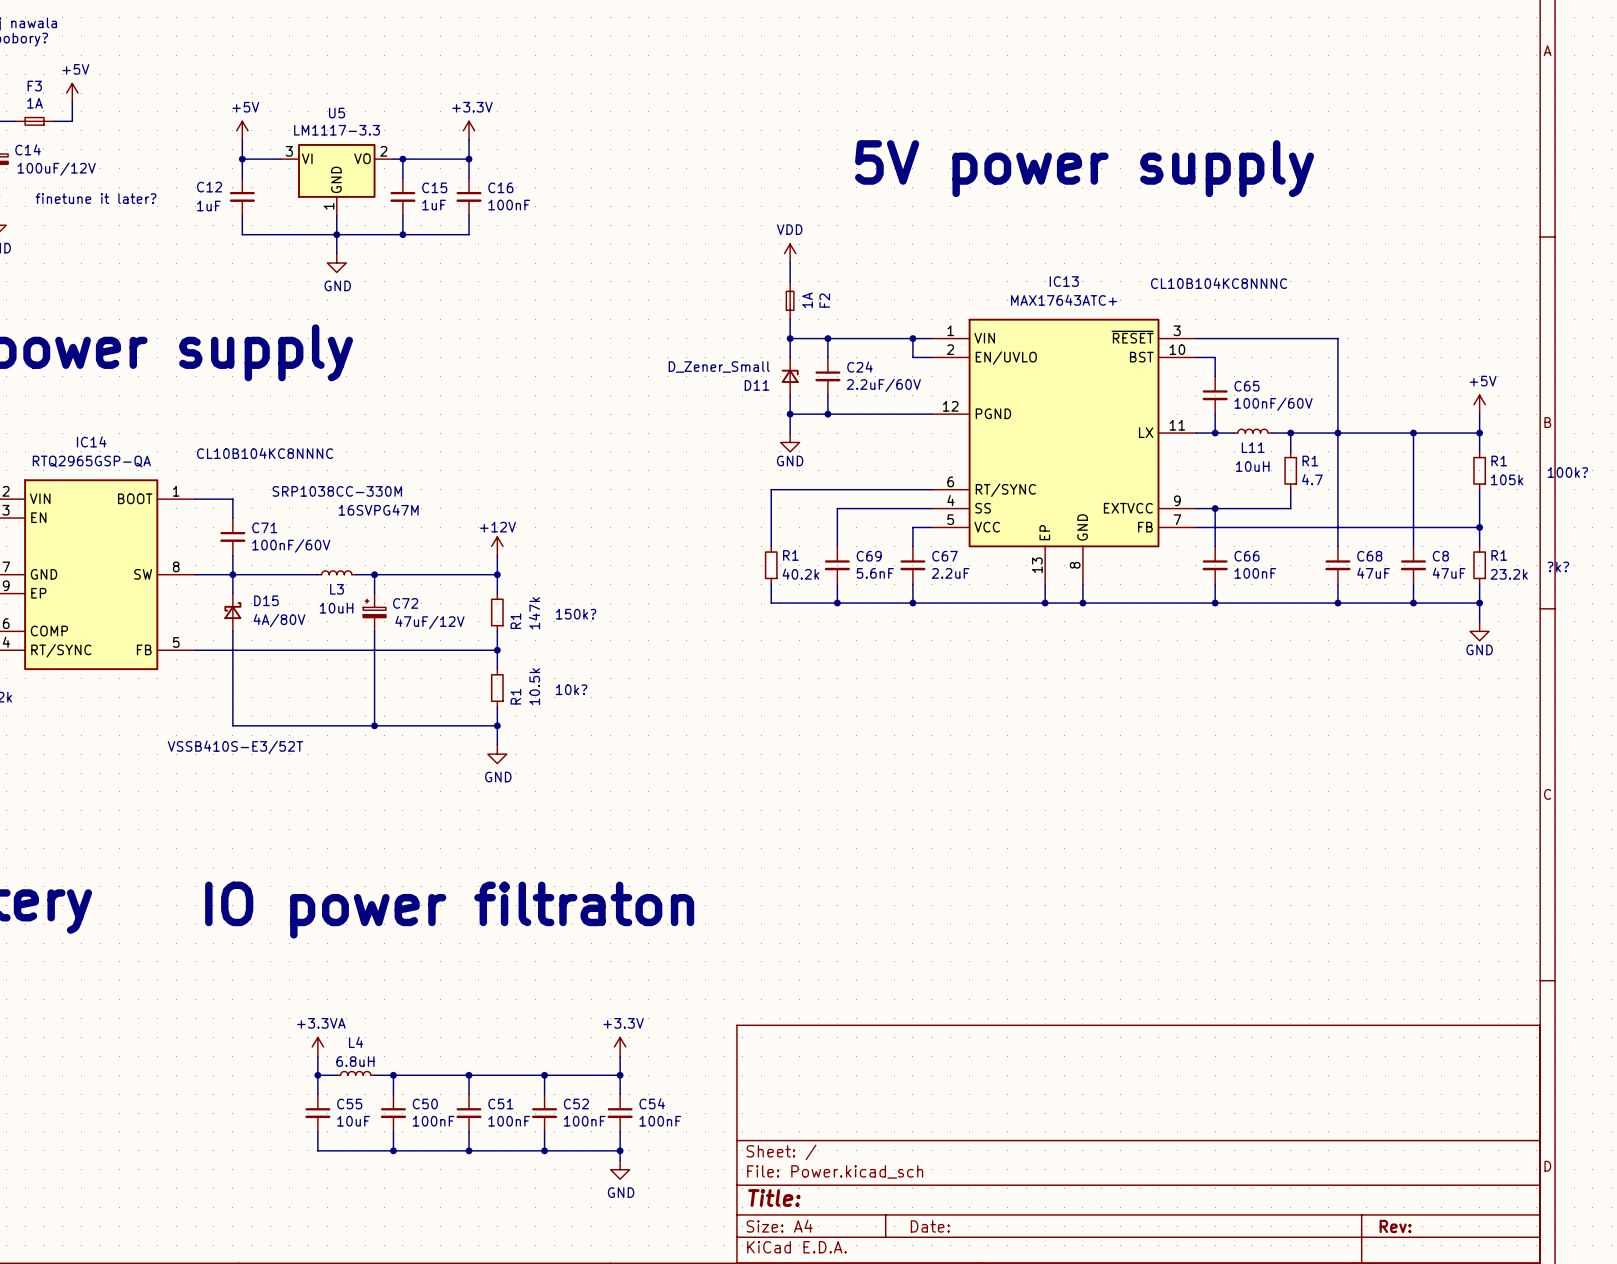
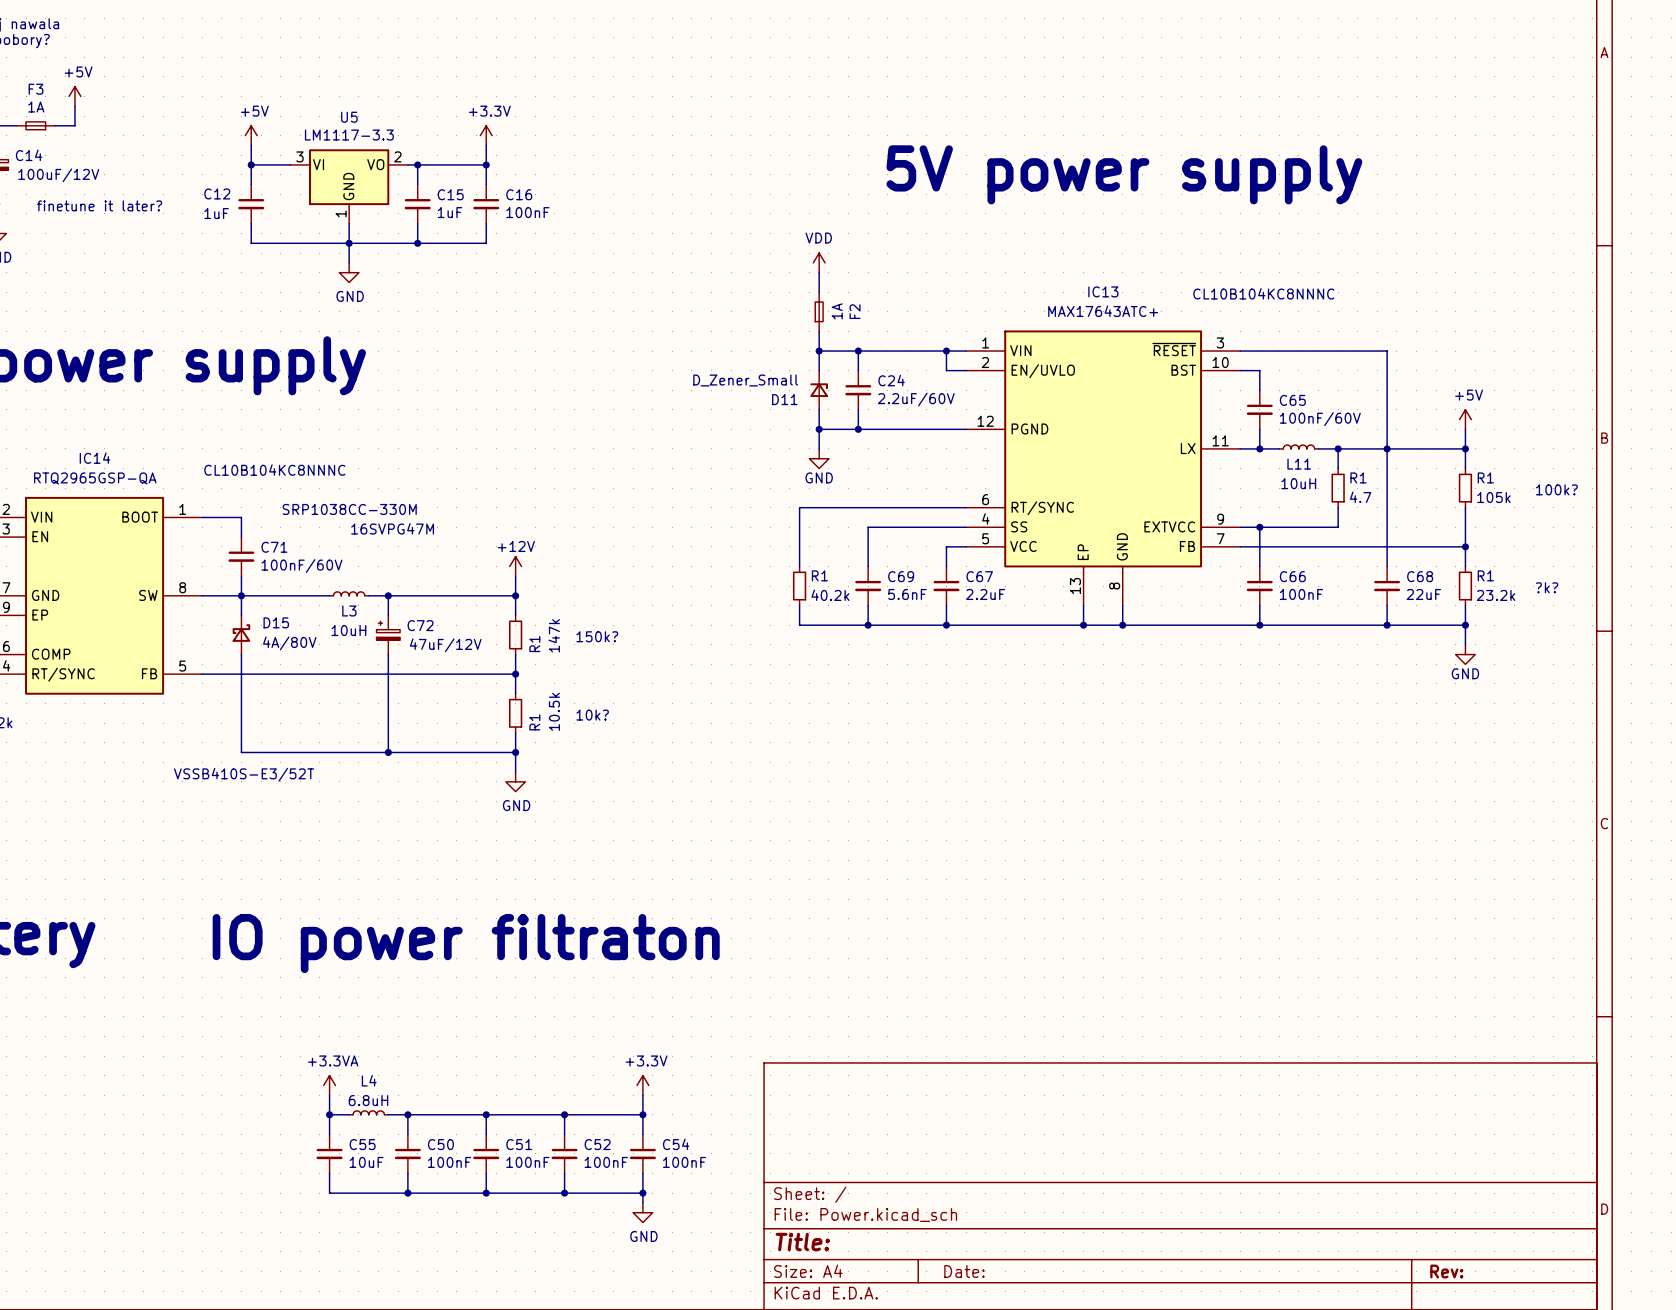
power symbol position: +5V (1479, 404) -> +5V (1465, 419)
wire: (1479, 414) (1479, 451) -> none
wire: (1413, 433) (1479, 433) -> (1465, 448) (1465, 429)
junction: (1479, 433) -> none
wire: (1413, 451) (1413, 489) -> none
R1 position: (1479, 470) -> (1465, 488)
text position: 100k? (1567, 472) -> 100k? (1556, 489)
wire: (1479, 489) (1479, 546) -> none
wire: (1413, 527) (1479, 527) -> none
junction: none -> (1465, 546)
junction: (1479, 527) -> none
C8: 47uF (1413, 565) -> none
R1 position: (1479, 565) -> (1465, 586)
text position: ?k? (1558, 566) -> ?k? (1547, 587)
C68 value: 47uF (1373, 573) -> 22uF (1423, 594)
wire: (1479, 584) (1479, 621) -> none
wire: (1413, 603) (1479, 603) -> (1465, 625) (1465, 644)
junction: (1479, 603) -> none
power symbol position: GND (1479, 631) -> GND (1465, 654)

